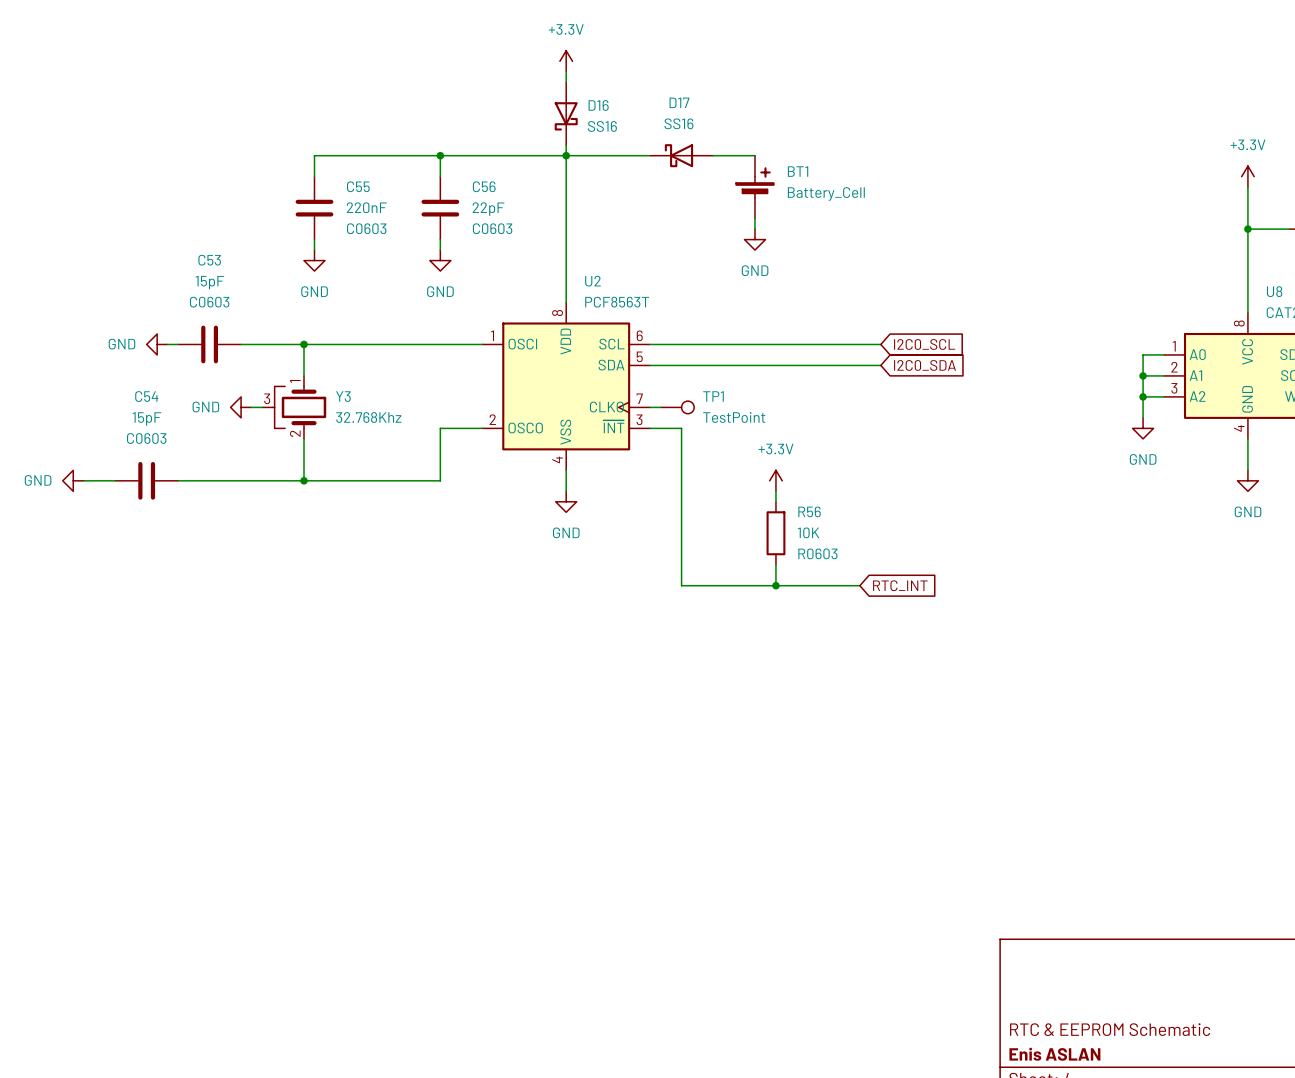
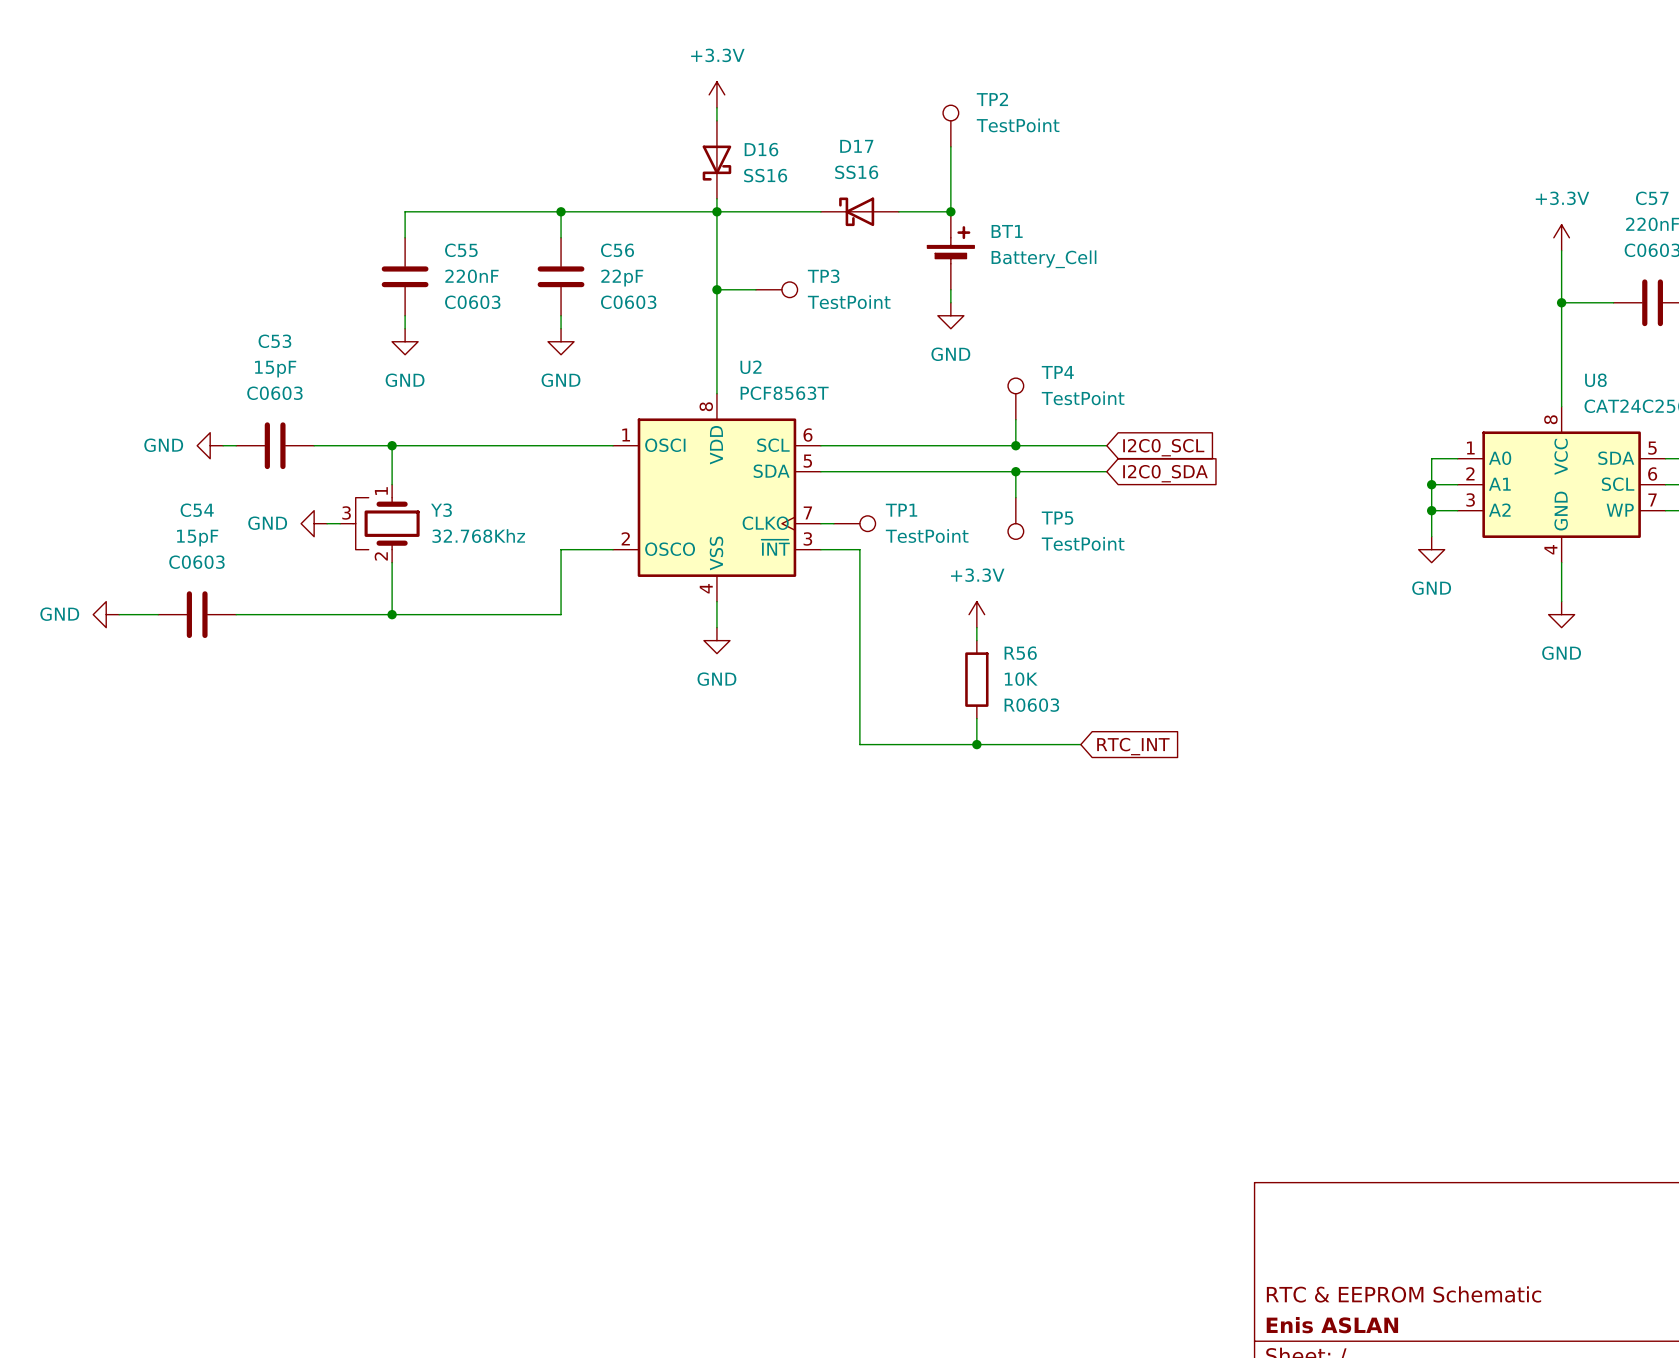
TP2: none -> TestPoint (950, 126)
wire: none -> (950, 146) (950, 211)
junction: none -> (950, 211)
wire: none -> (716, 289) (755, 289)
junction: none -> (716, 289)
TP3: none -> TestPoint (776, 289)
TP4: none -> TestPoint (1015, 398)
wire: none -> (1015, 419) (1015, 445)
junction: none -> (1015, 445)
wire: none -> (1015, 471) (1015, 497)
junction: none -> (1015, 471)
TP5: none -> TestPoint (1015, 518)

